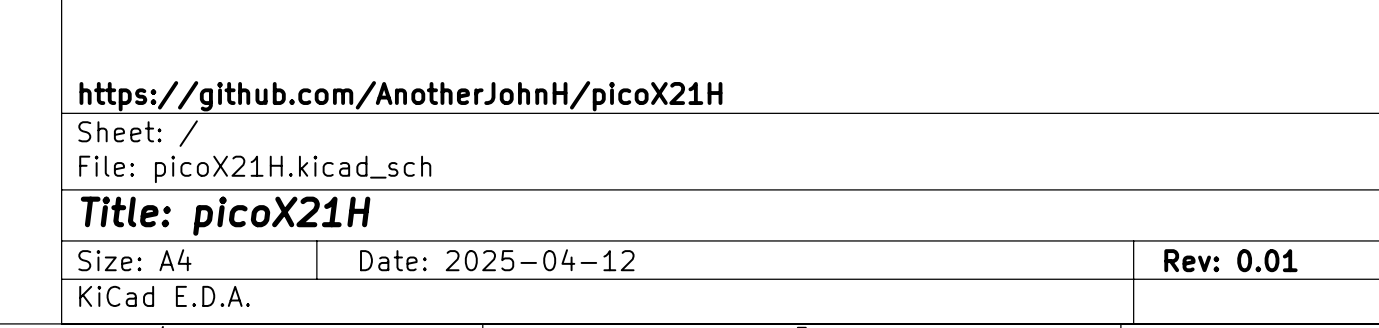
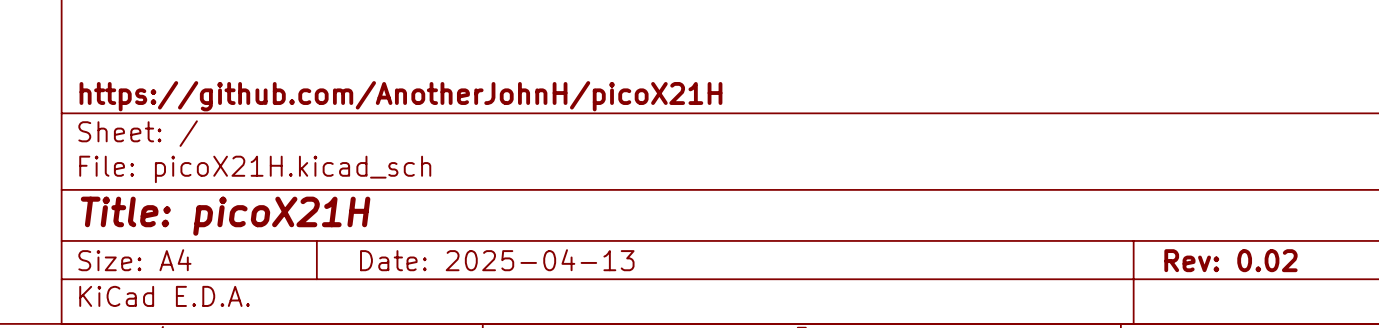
title block: Date: 2025-04-12 (497, 260) -> Date: 2025-04-13 (497, 260)
title block: Rev: 0.01 (1230, 260) -> Rev: 0.02 (1230, 260)

